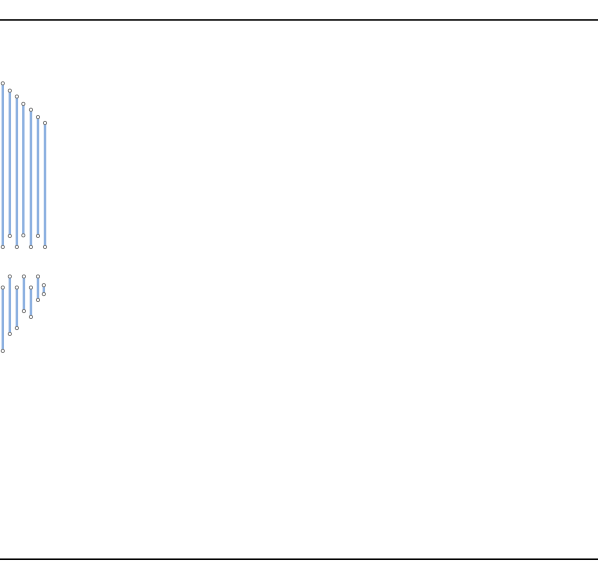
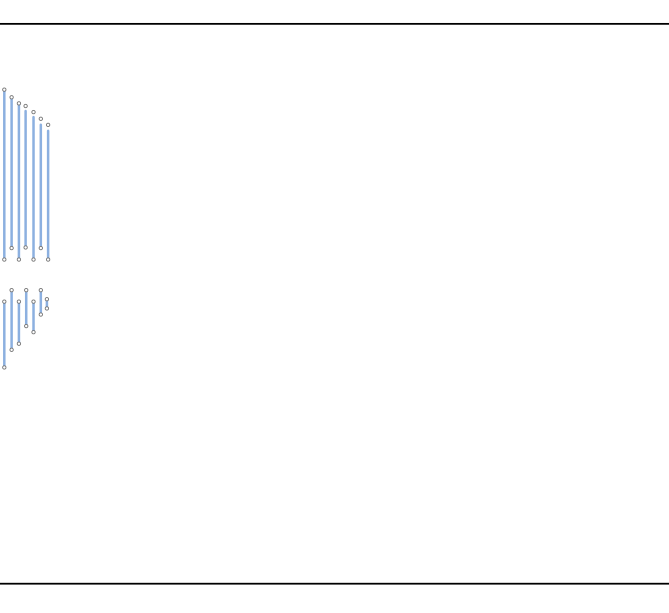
via: none -> (25, 106)
via: (23, 103) -> none
via: none -> (33, 112)
via: (30, 109) -> none
via: none -> (40, 118)
via: (37, 117) -> none
via: none -> (48, 124)
via: (45, 122) -> none

